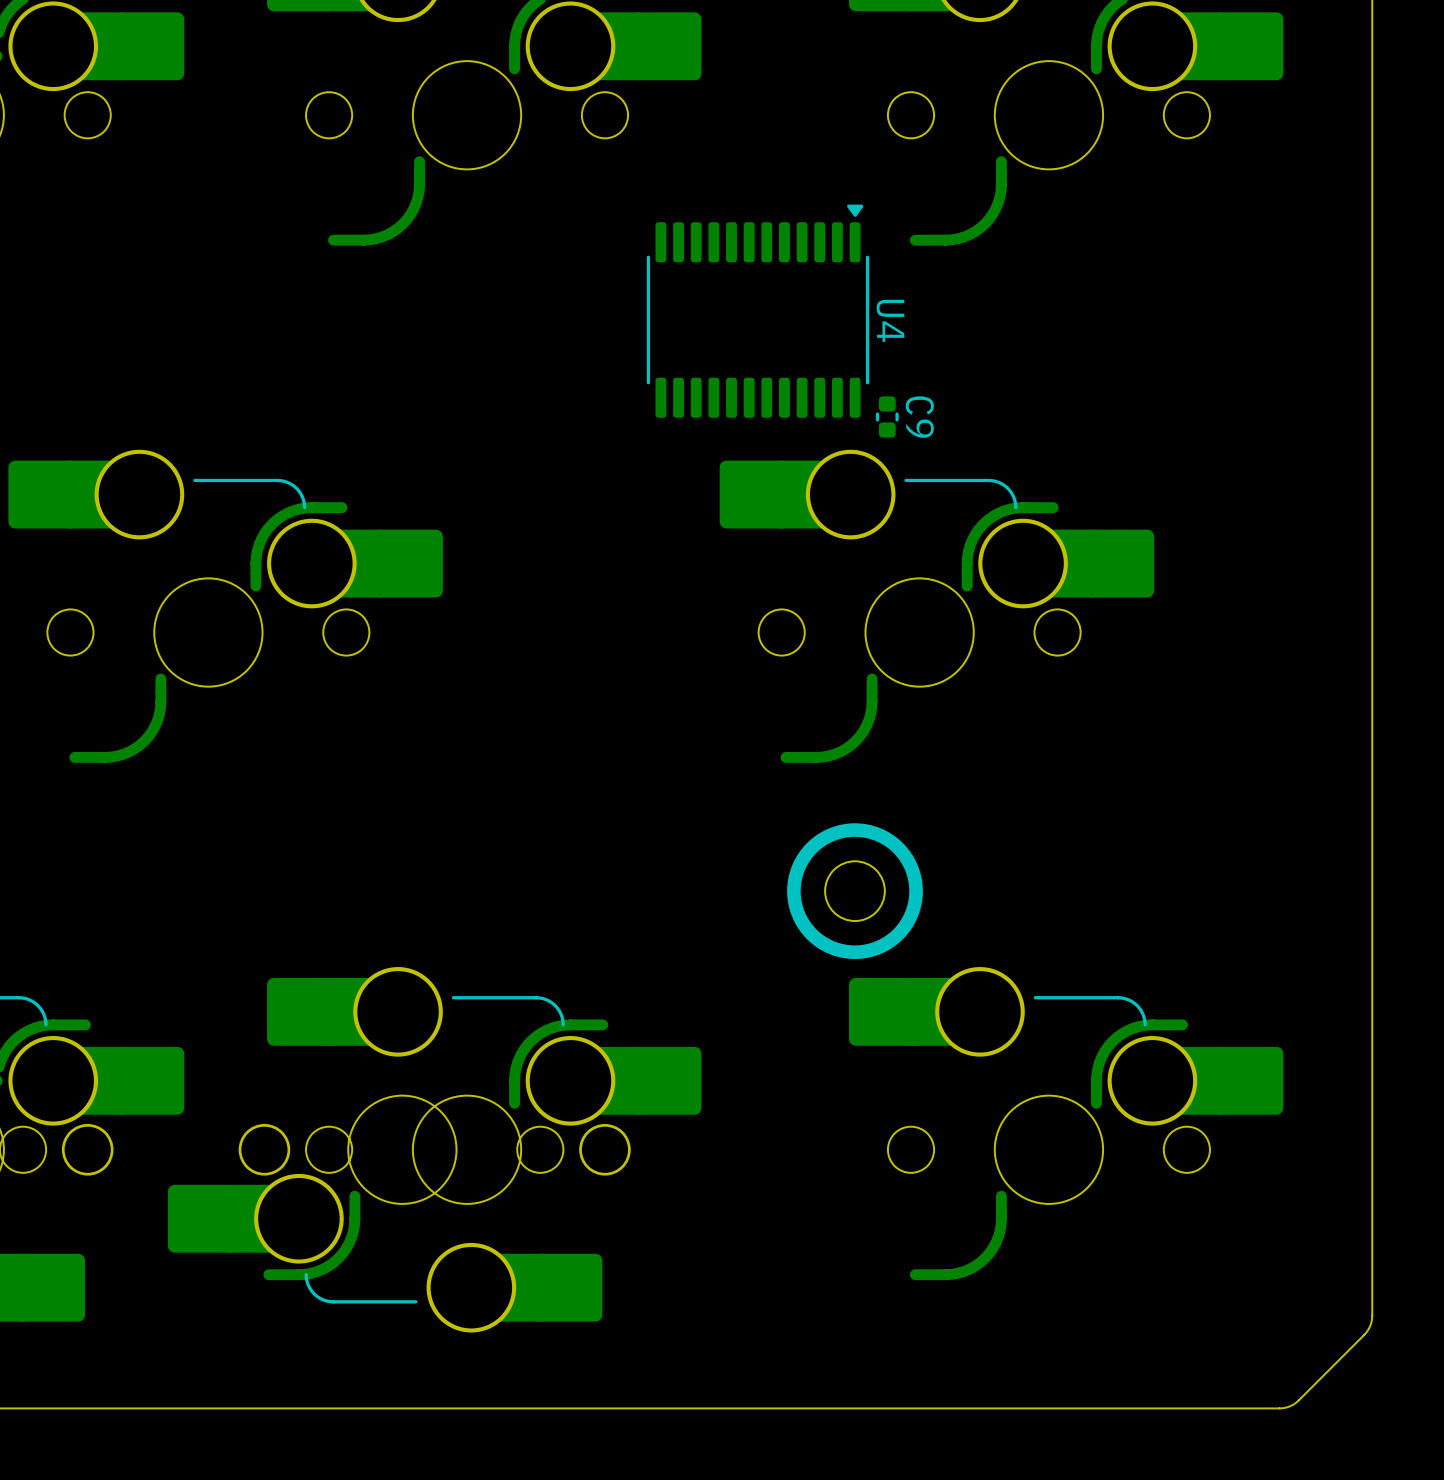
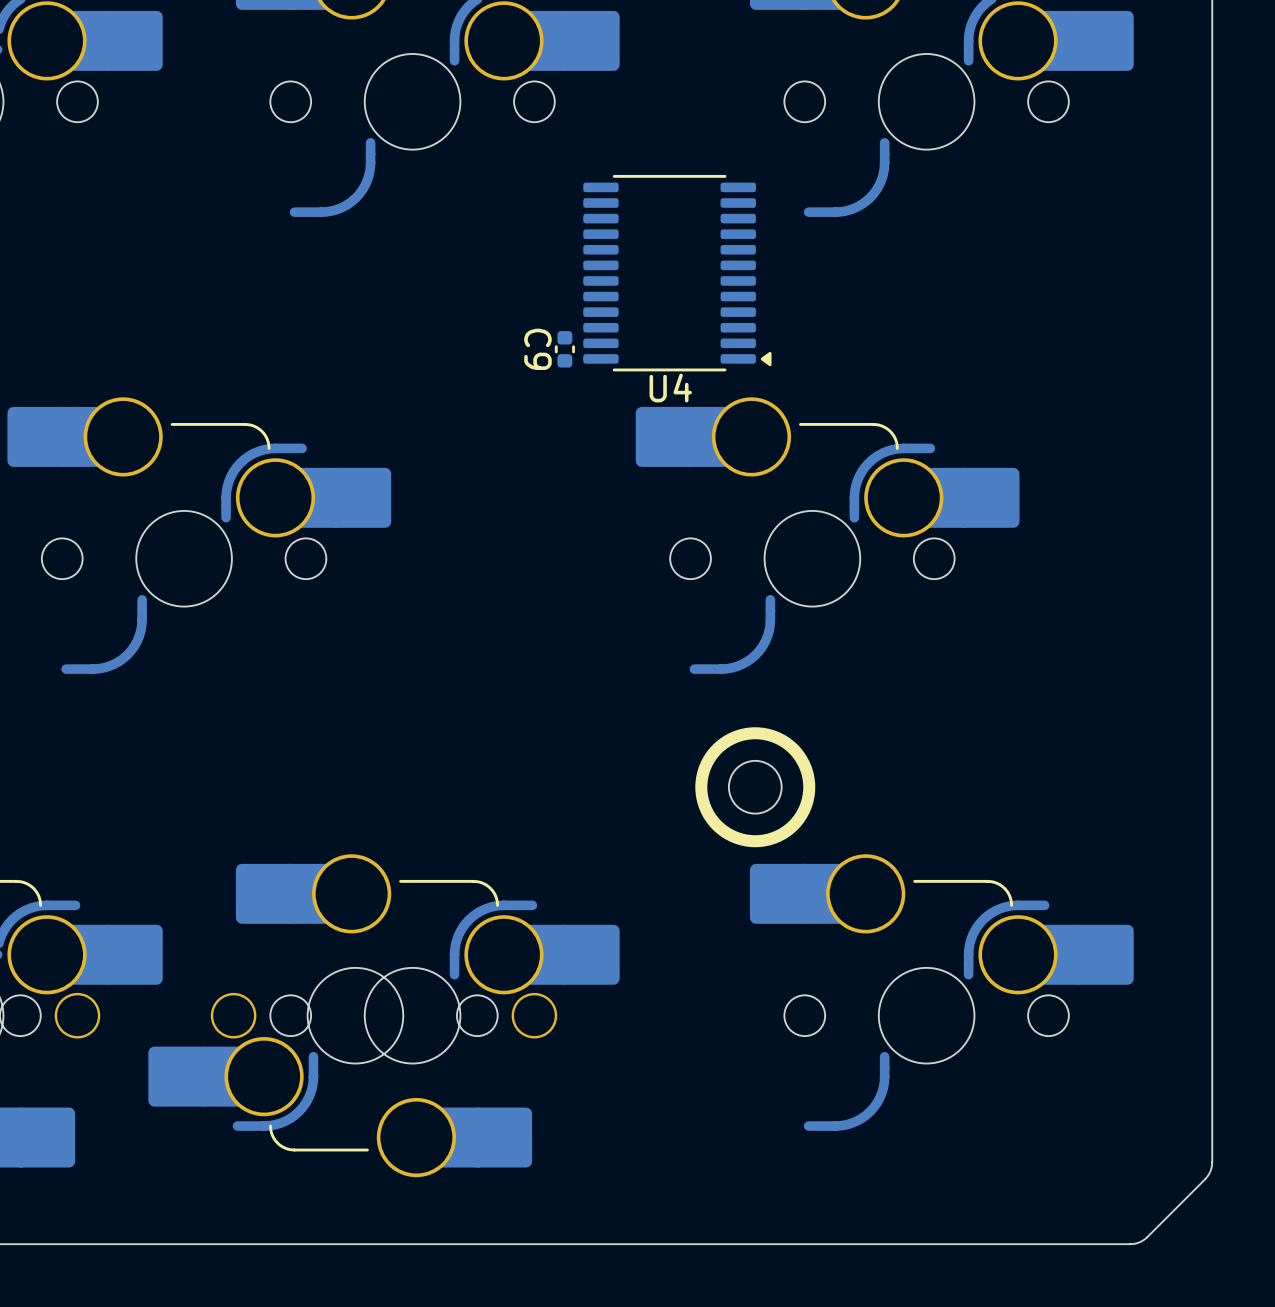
U4 rotation: 0° (757, 311) -> 90° clockwise (677, 273)
C9 position: (887, 416) -> (564, 349)
C9 name position: C9 (919, 417) -> C9 (537, 349)

